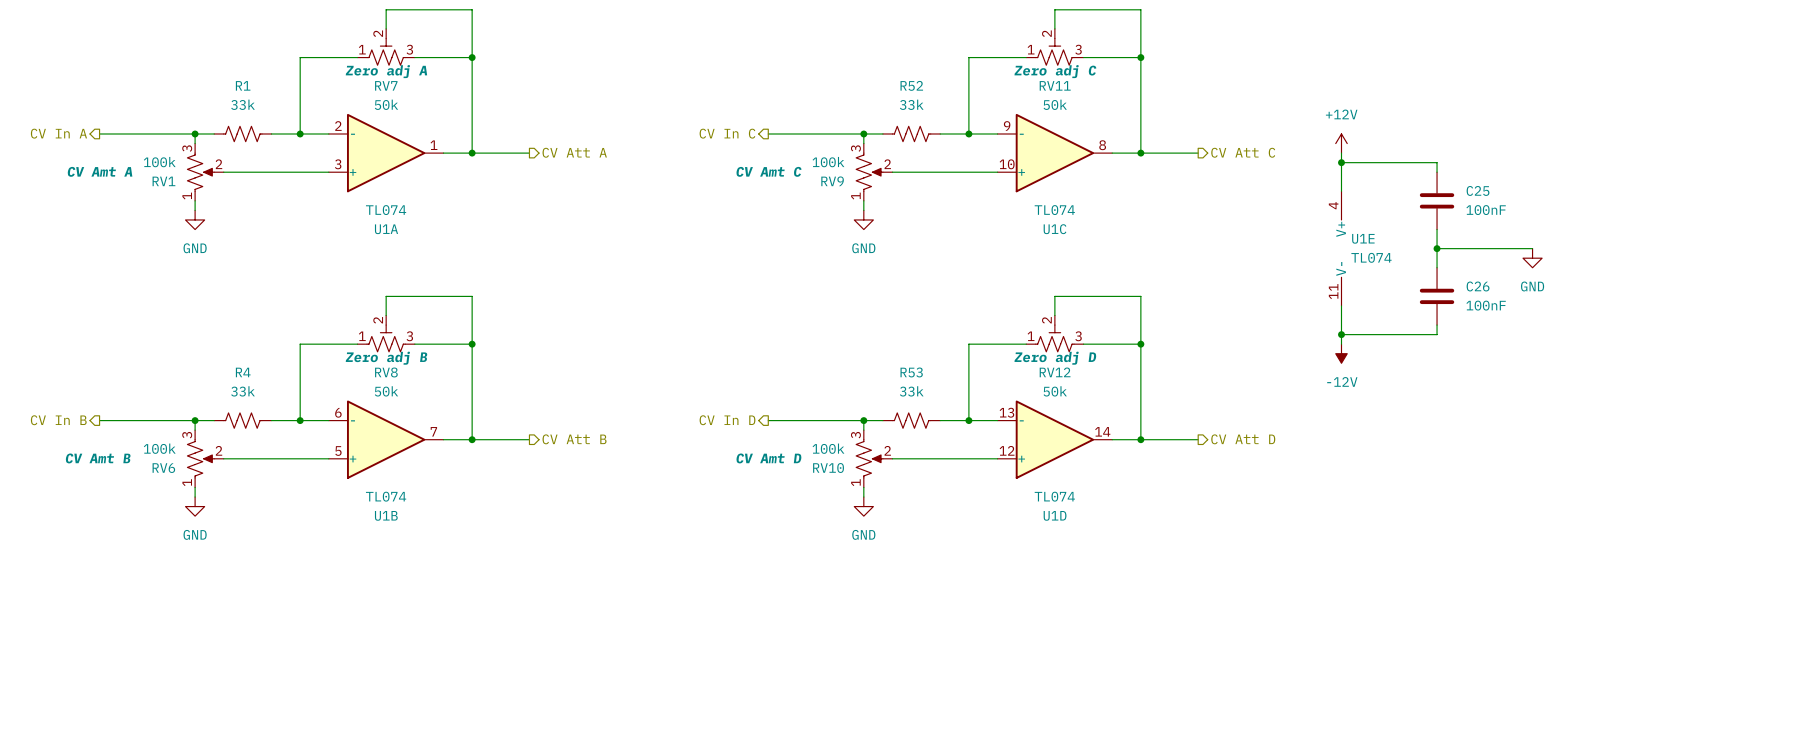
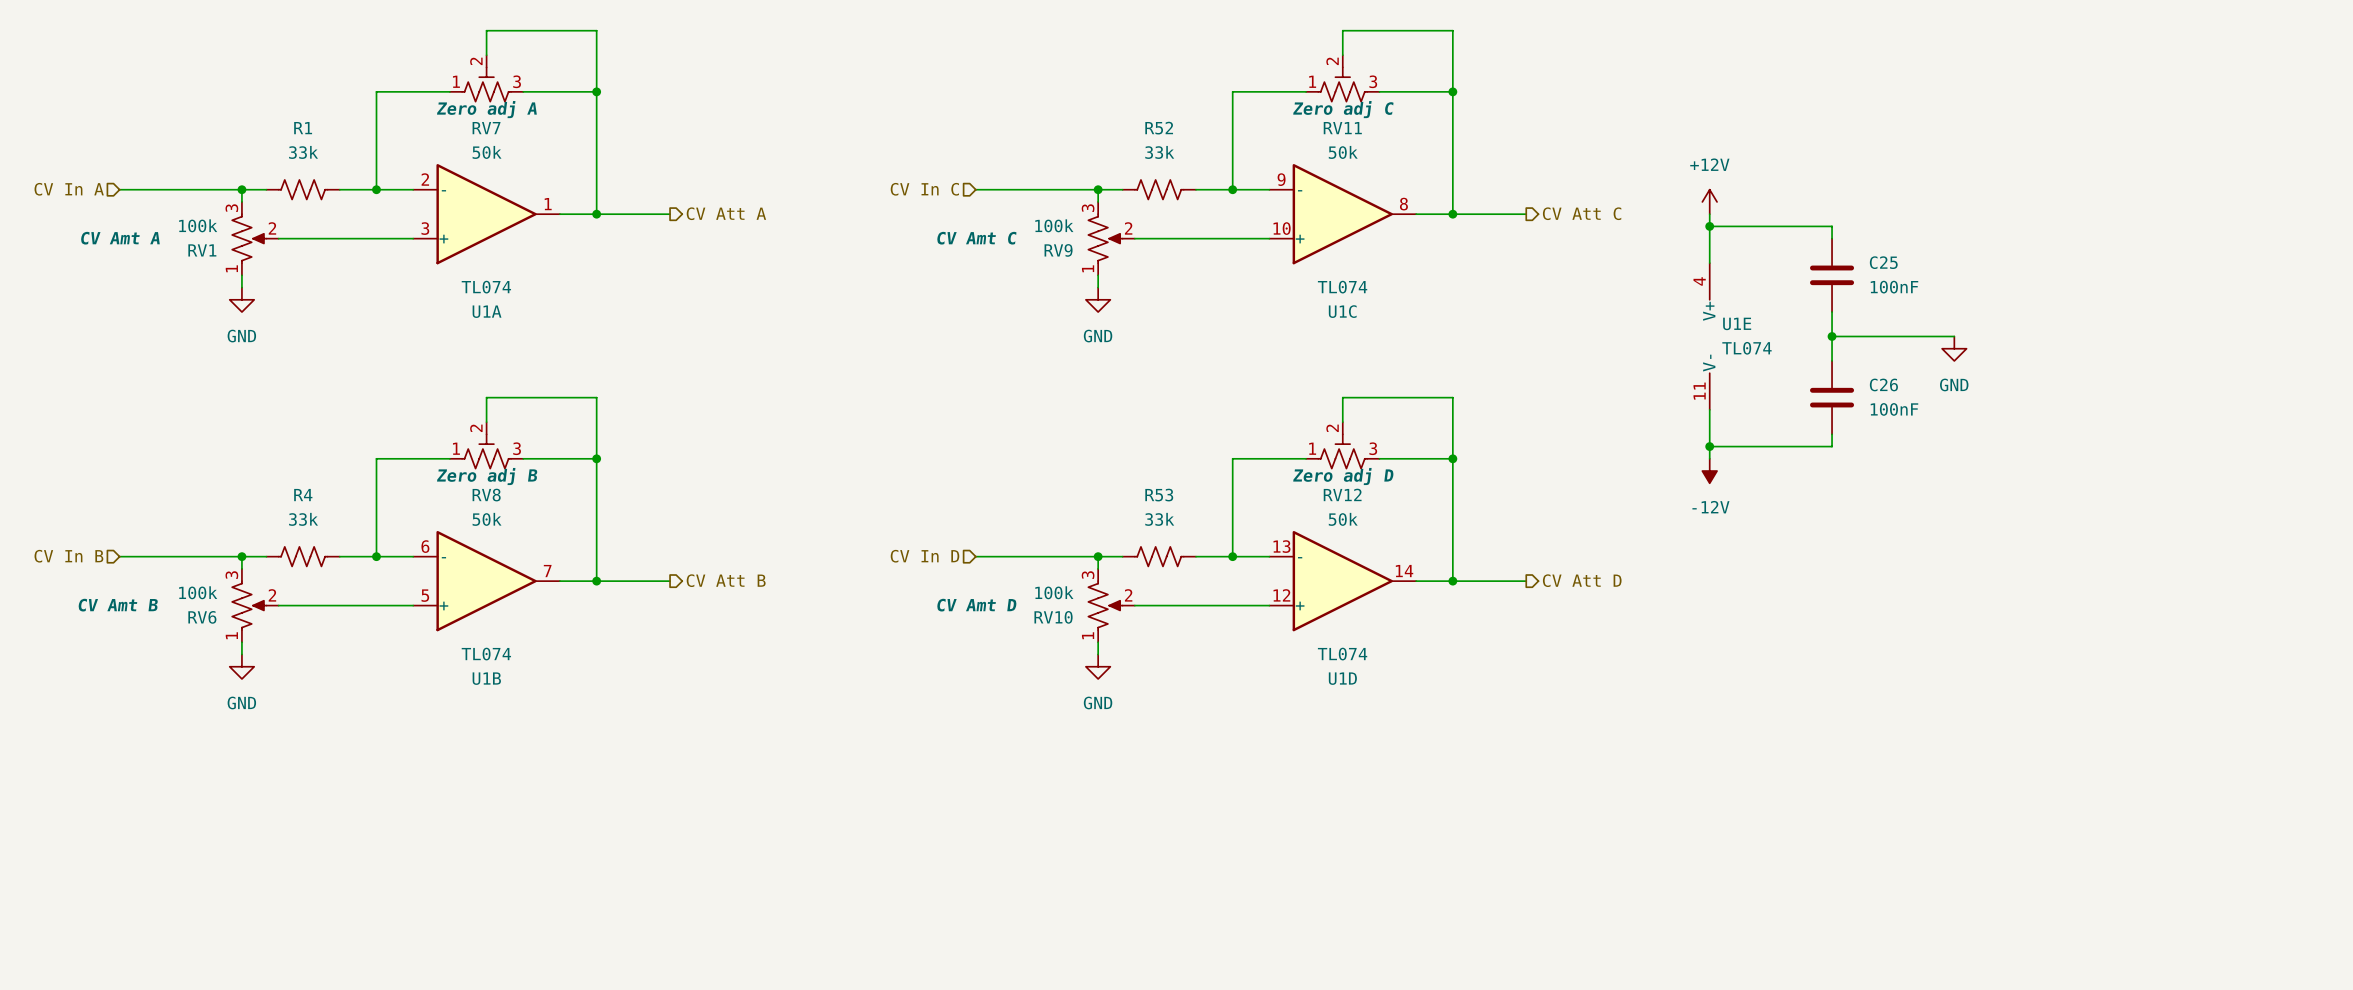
hierarchical label shape: output (58, 133) -> input (69, 189)
hierarchical label shape: output (727, 133) -> input (924, 189)
hierarchical label shape: output (58, 420) -> input (68, 556)
hierarchical label shape: output (727, 420) -> input (924, 556)

